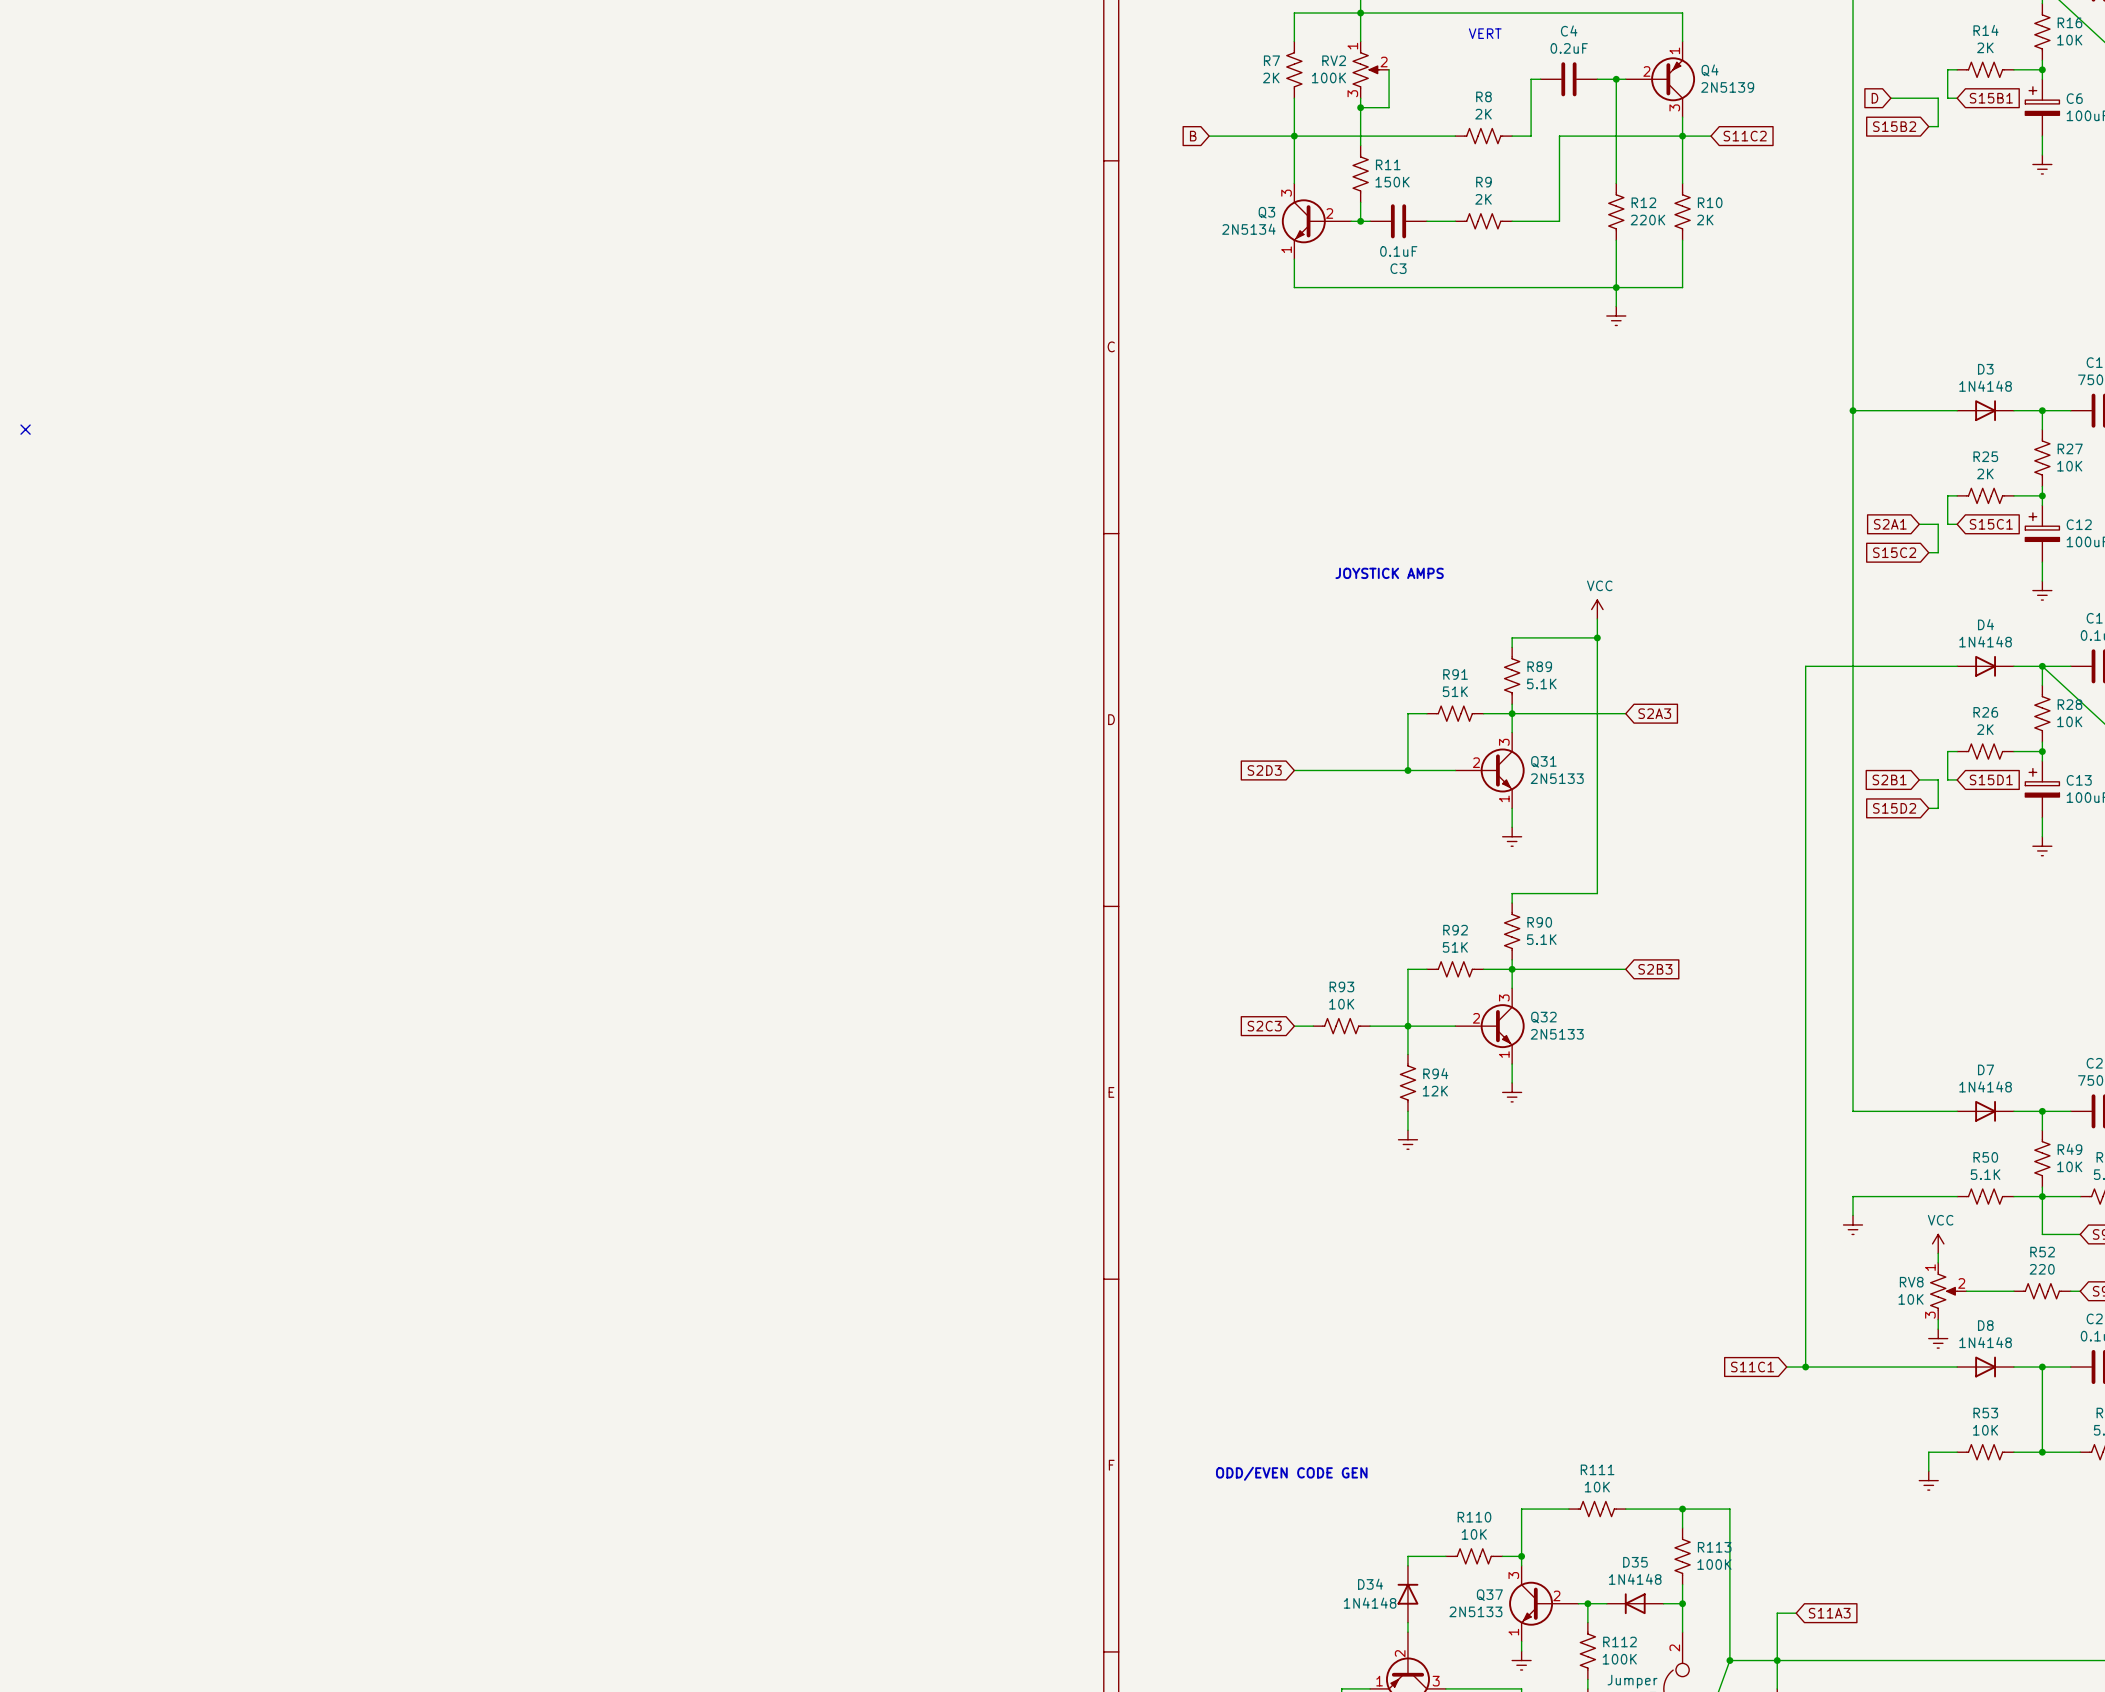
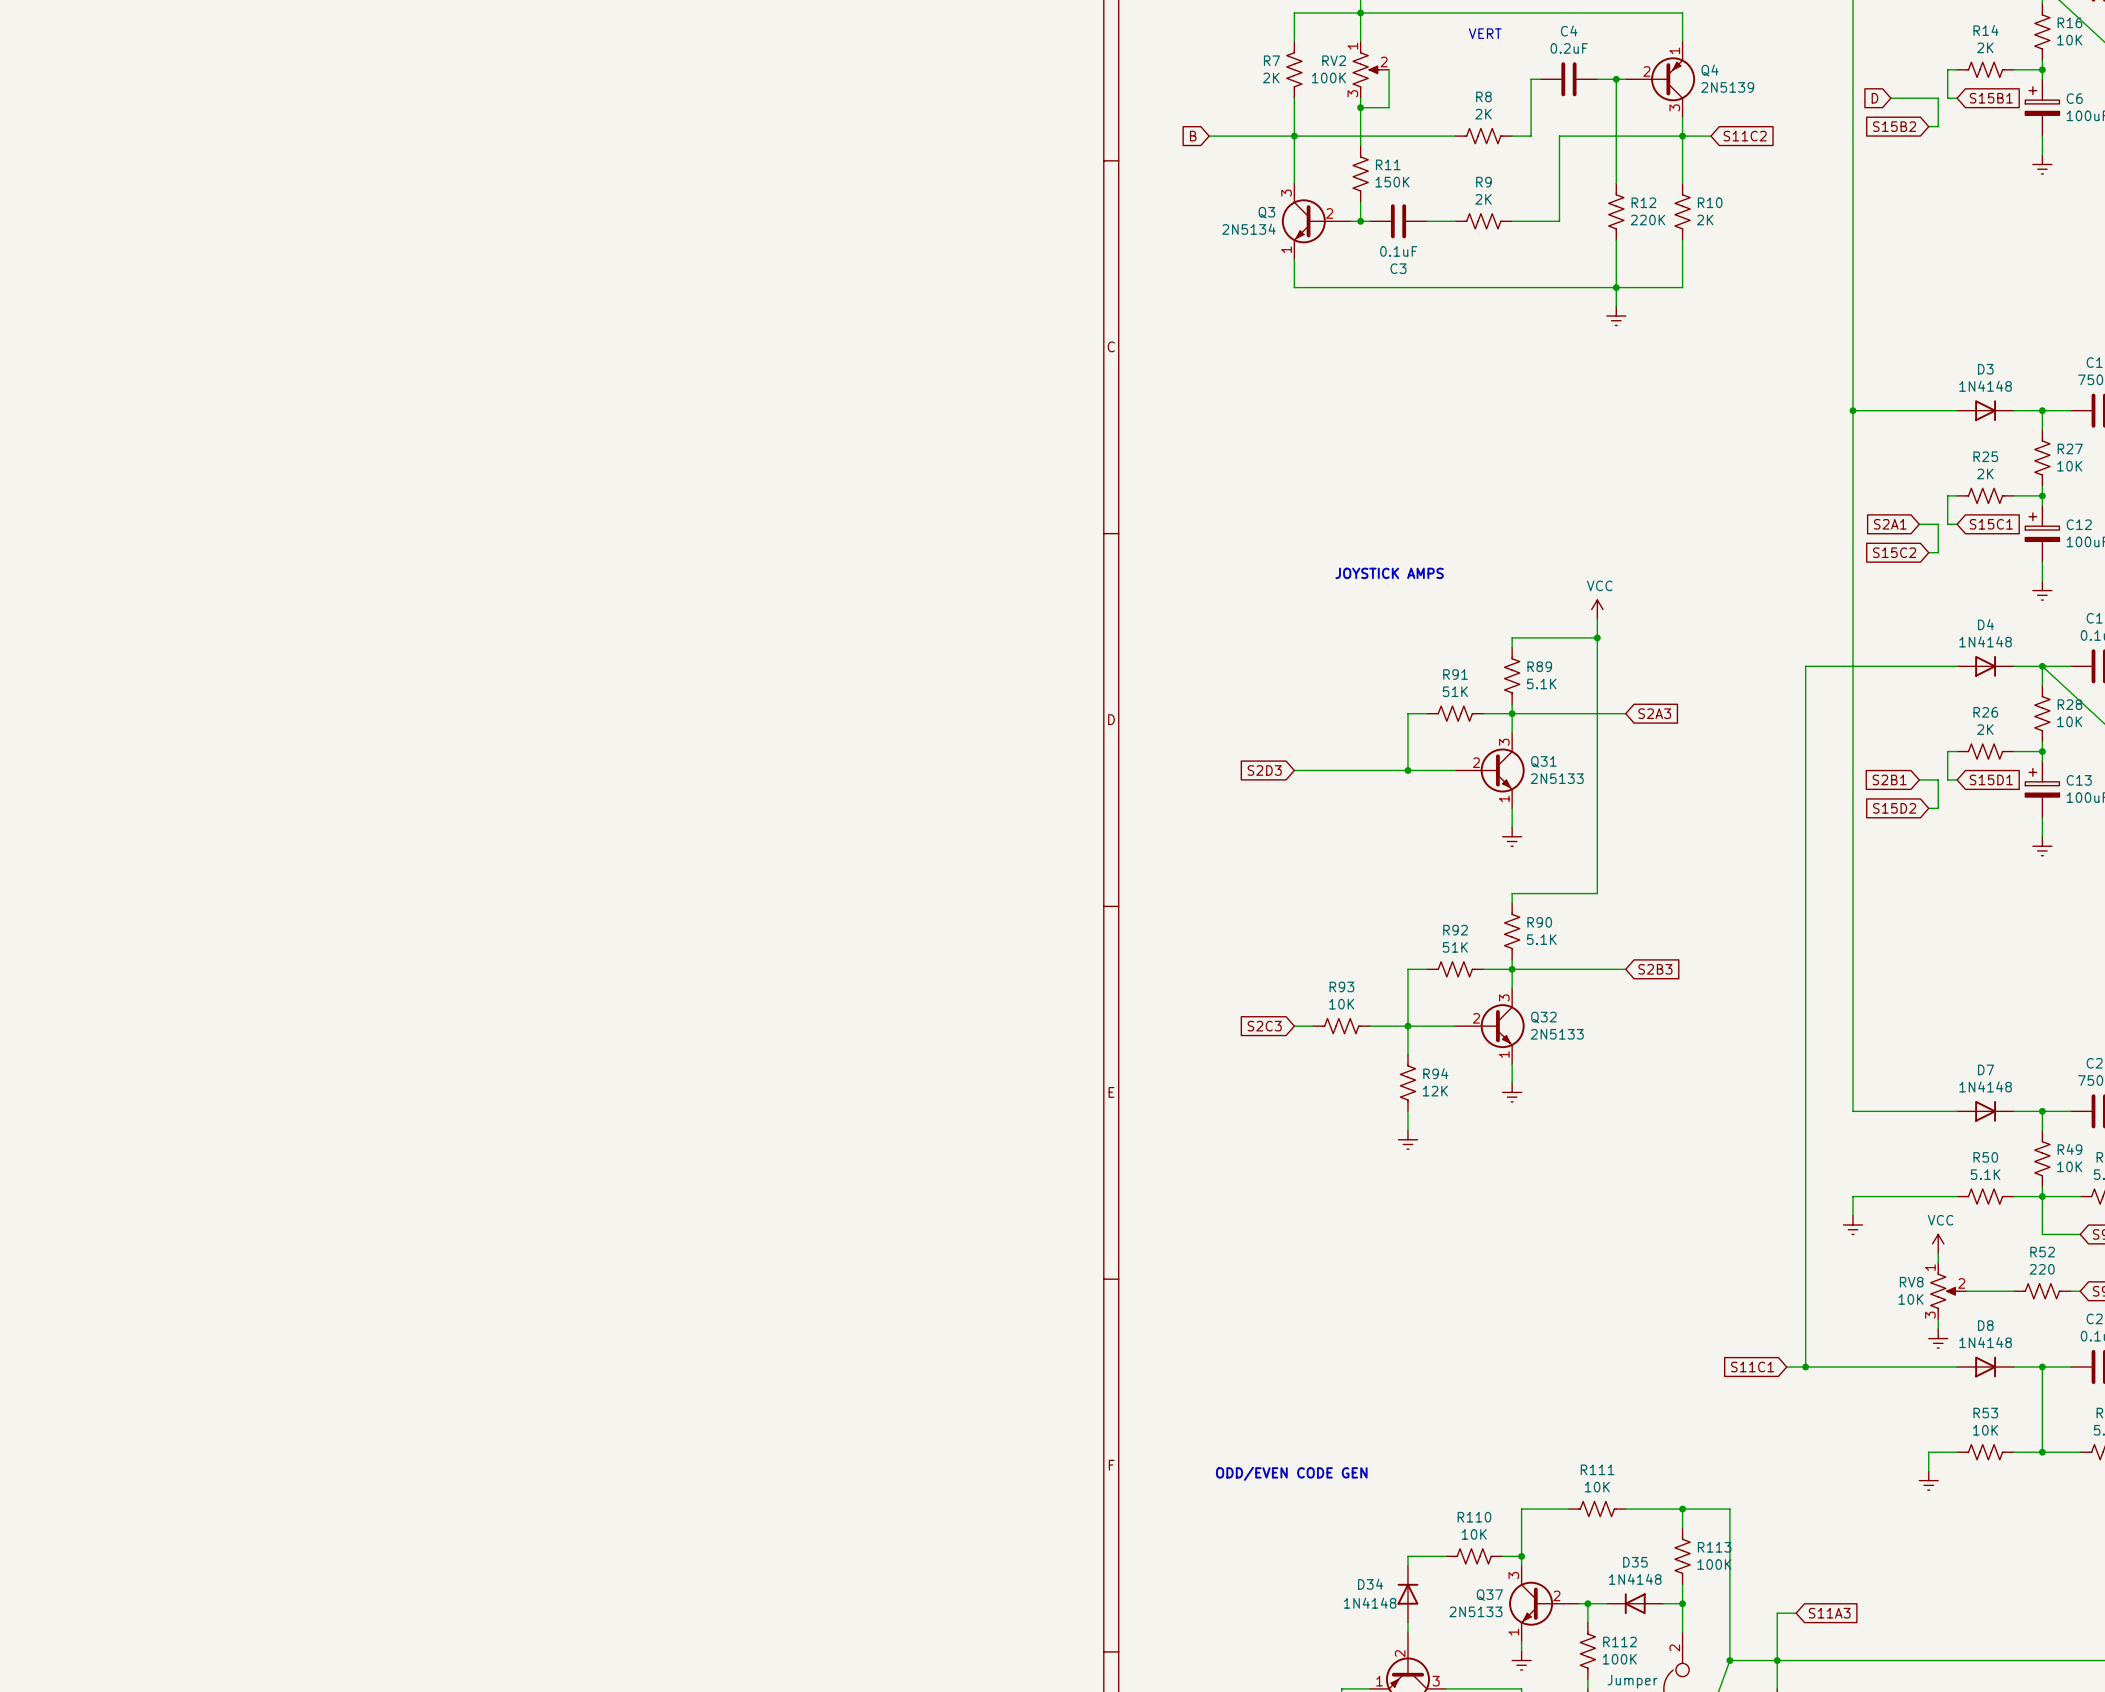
no-connect mark: (25, 429) -> none

